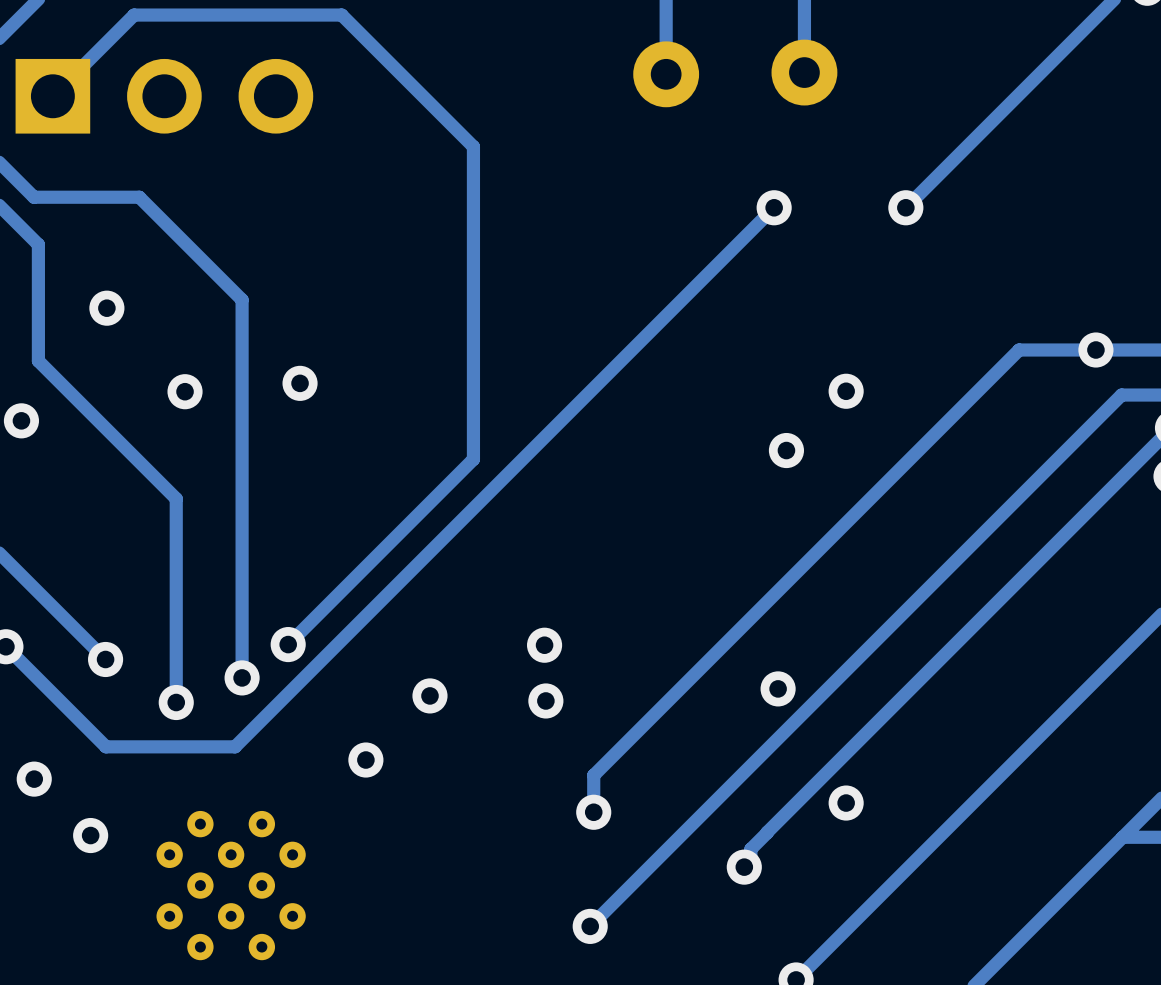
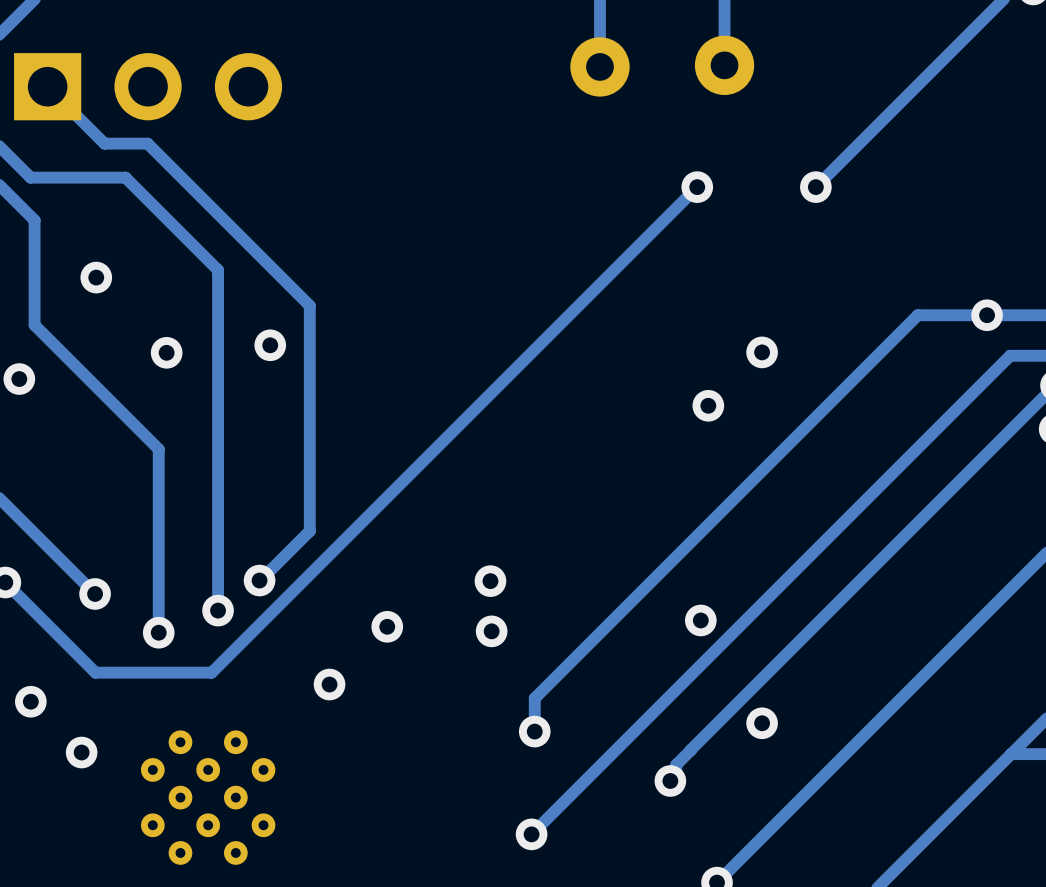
track: (52, 96) (134, 15) (341, 15) (473, 146) (473, 459) (288, 644) -> (47, 86) (104, 143) (147, 143) (309, 305) (309, 531) (261, 579) (258, 579) (259, 580)

